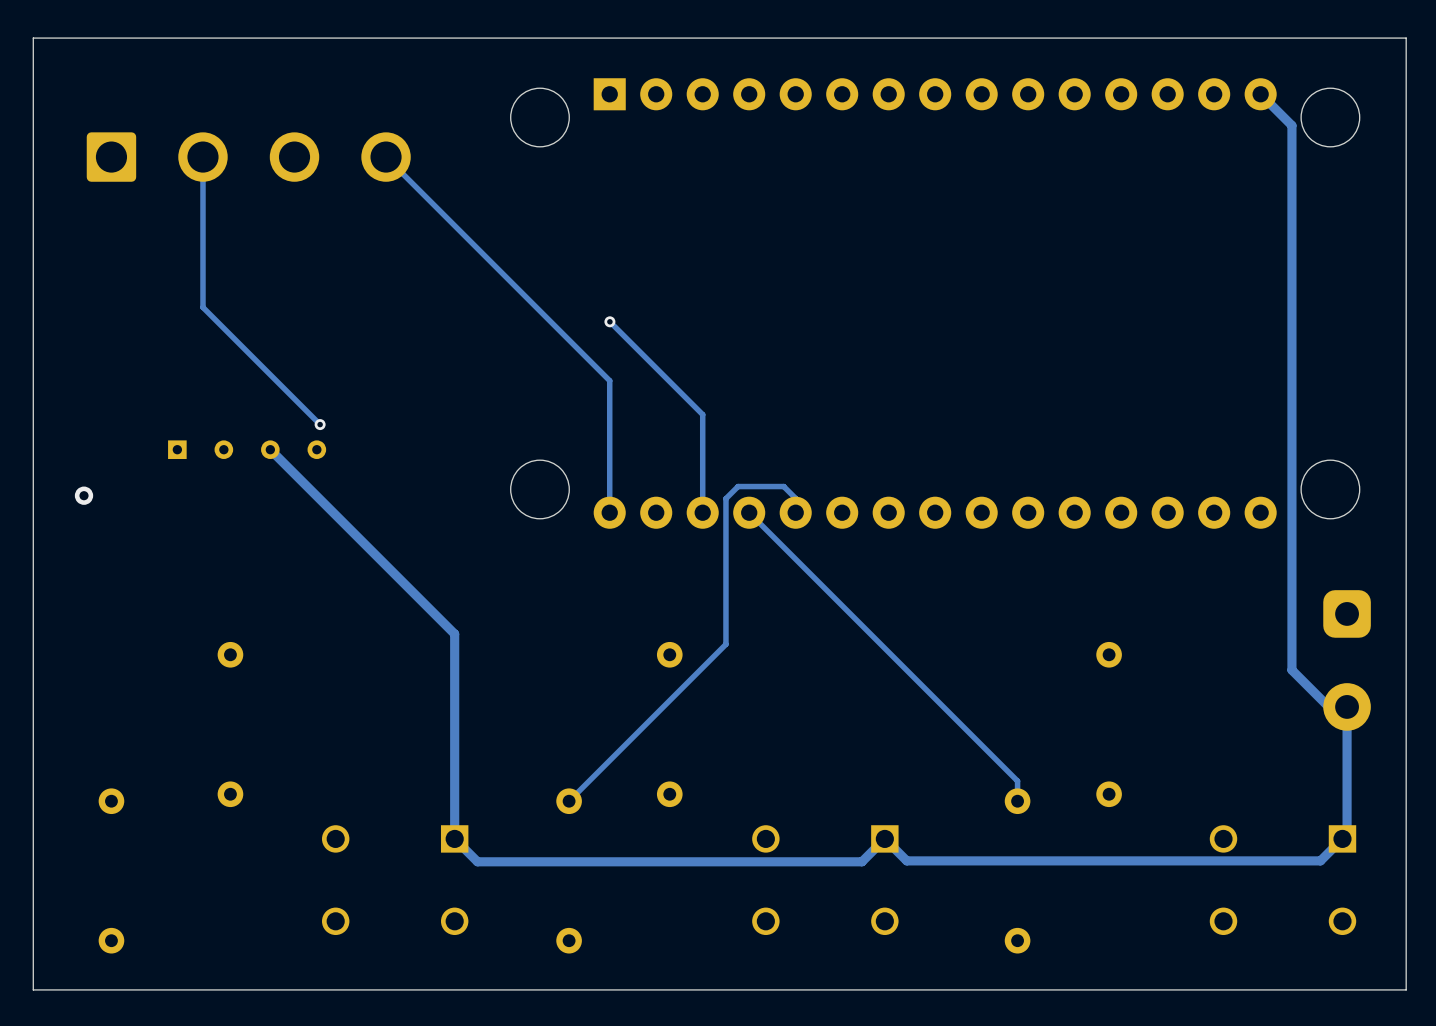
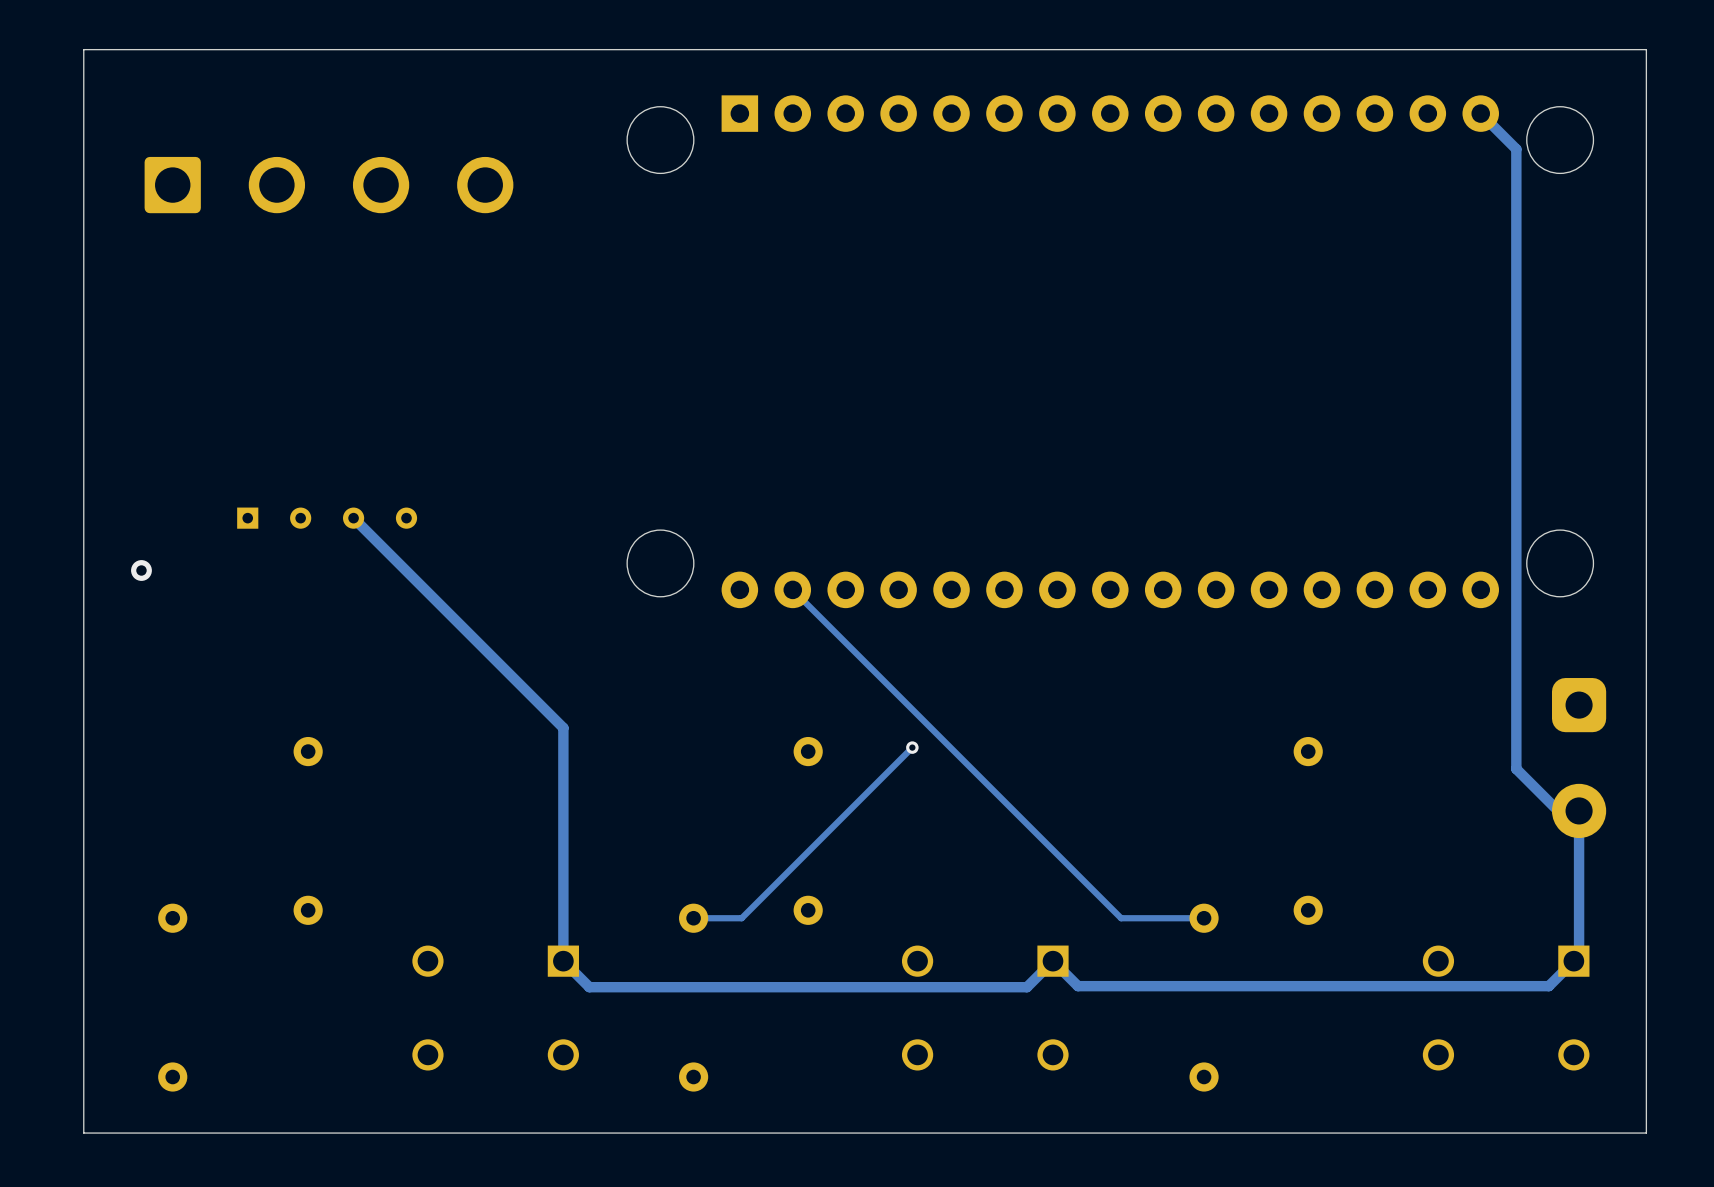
track: (202, 157) (202, 307) (320, 424) -> none
track: (386, 157) (609, 380) (609, 512) -> none
track: (609, 321) (702, 414) (702, 512) -> none
via: (609, 321) -> none
via: (320, 424) -> none
track: (749, 512) (1017, 781) (1017, 801) -> (792, 589) (1121, 918) (1204, 918)
track: (795, 512) (795, 498) (783, 486) (738, 486) (725, 498) (725, 644) (569, 801) -> (912, 747) (741, 918) (693, 918)
via: none -> (912, 747)

